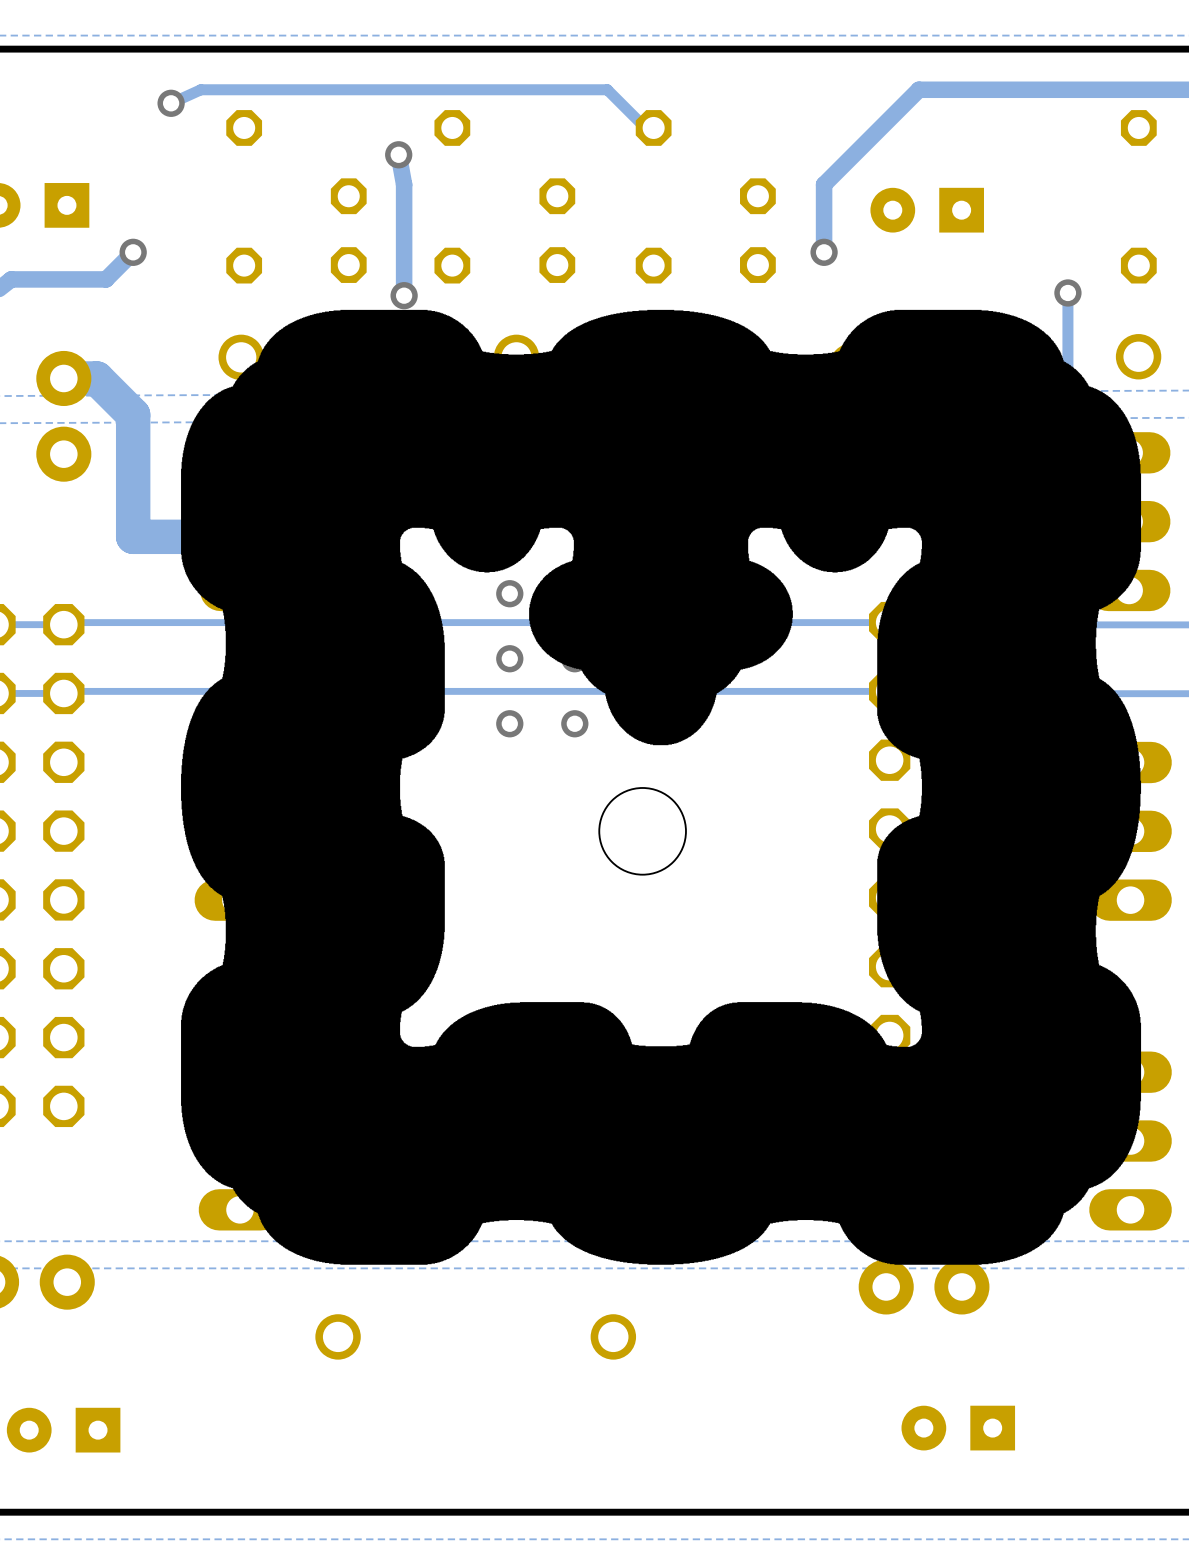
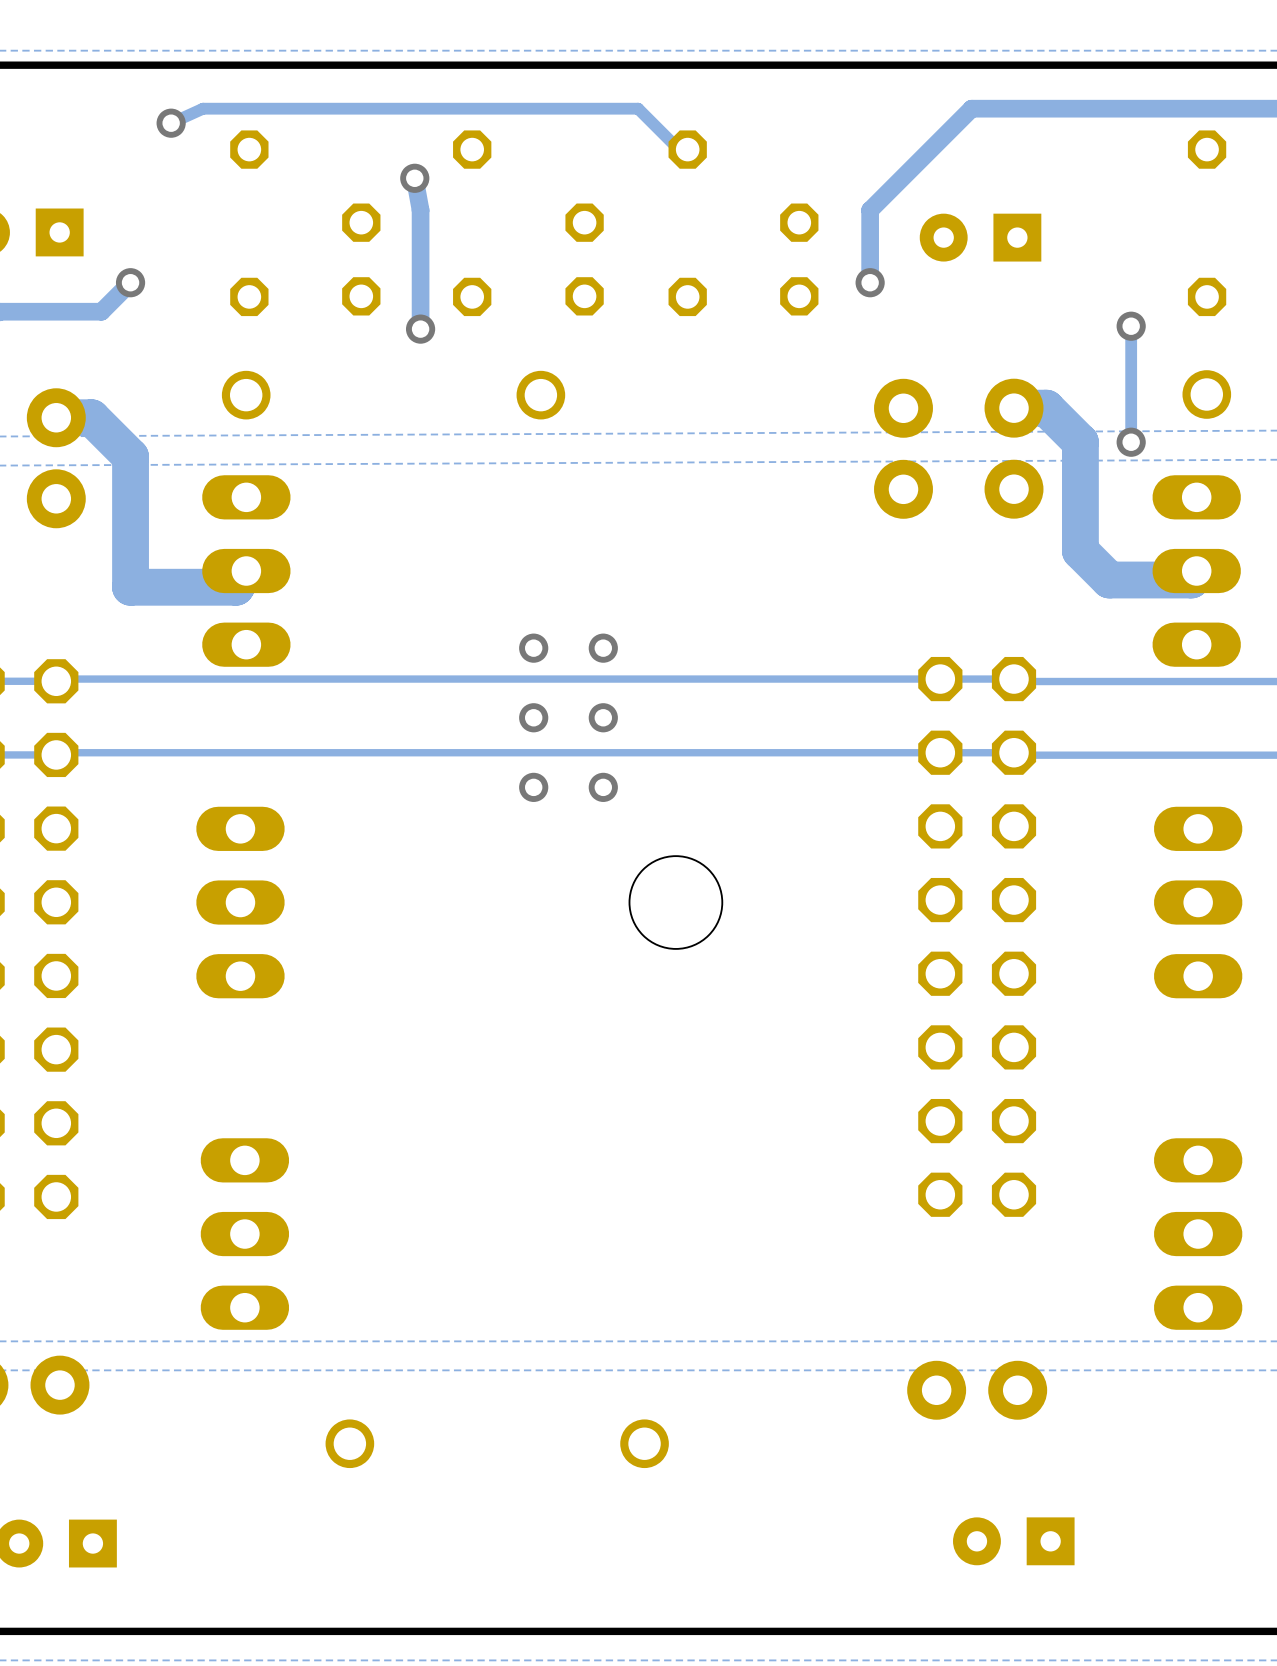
drawing: [181, 309, 1142, 1265] -> none

